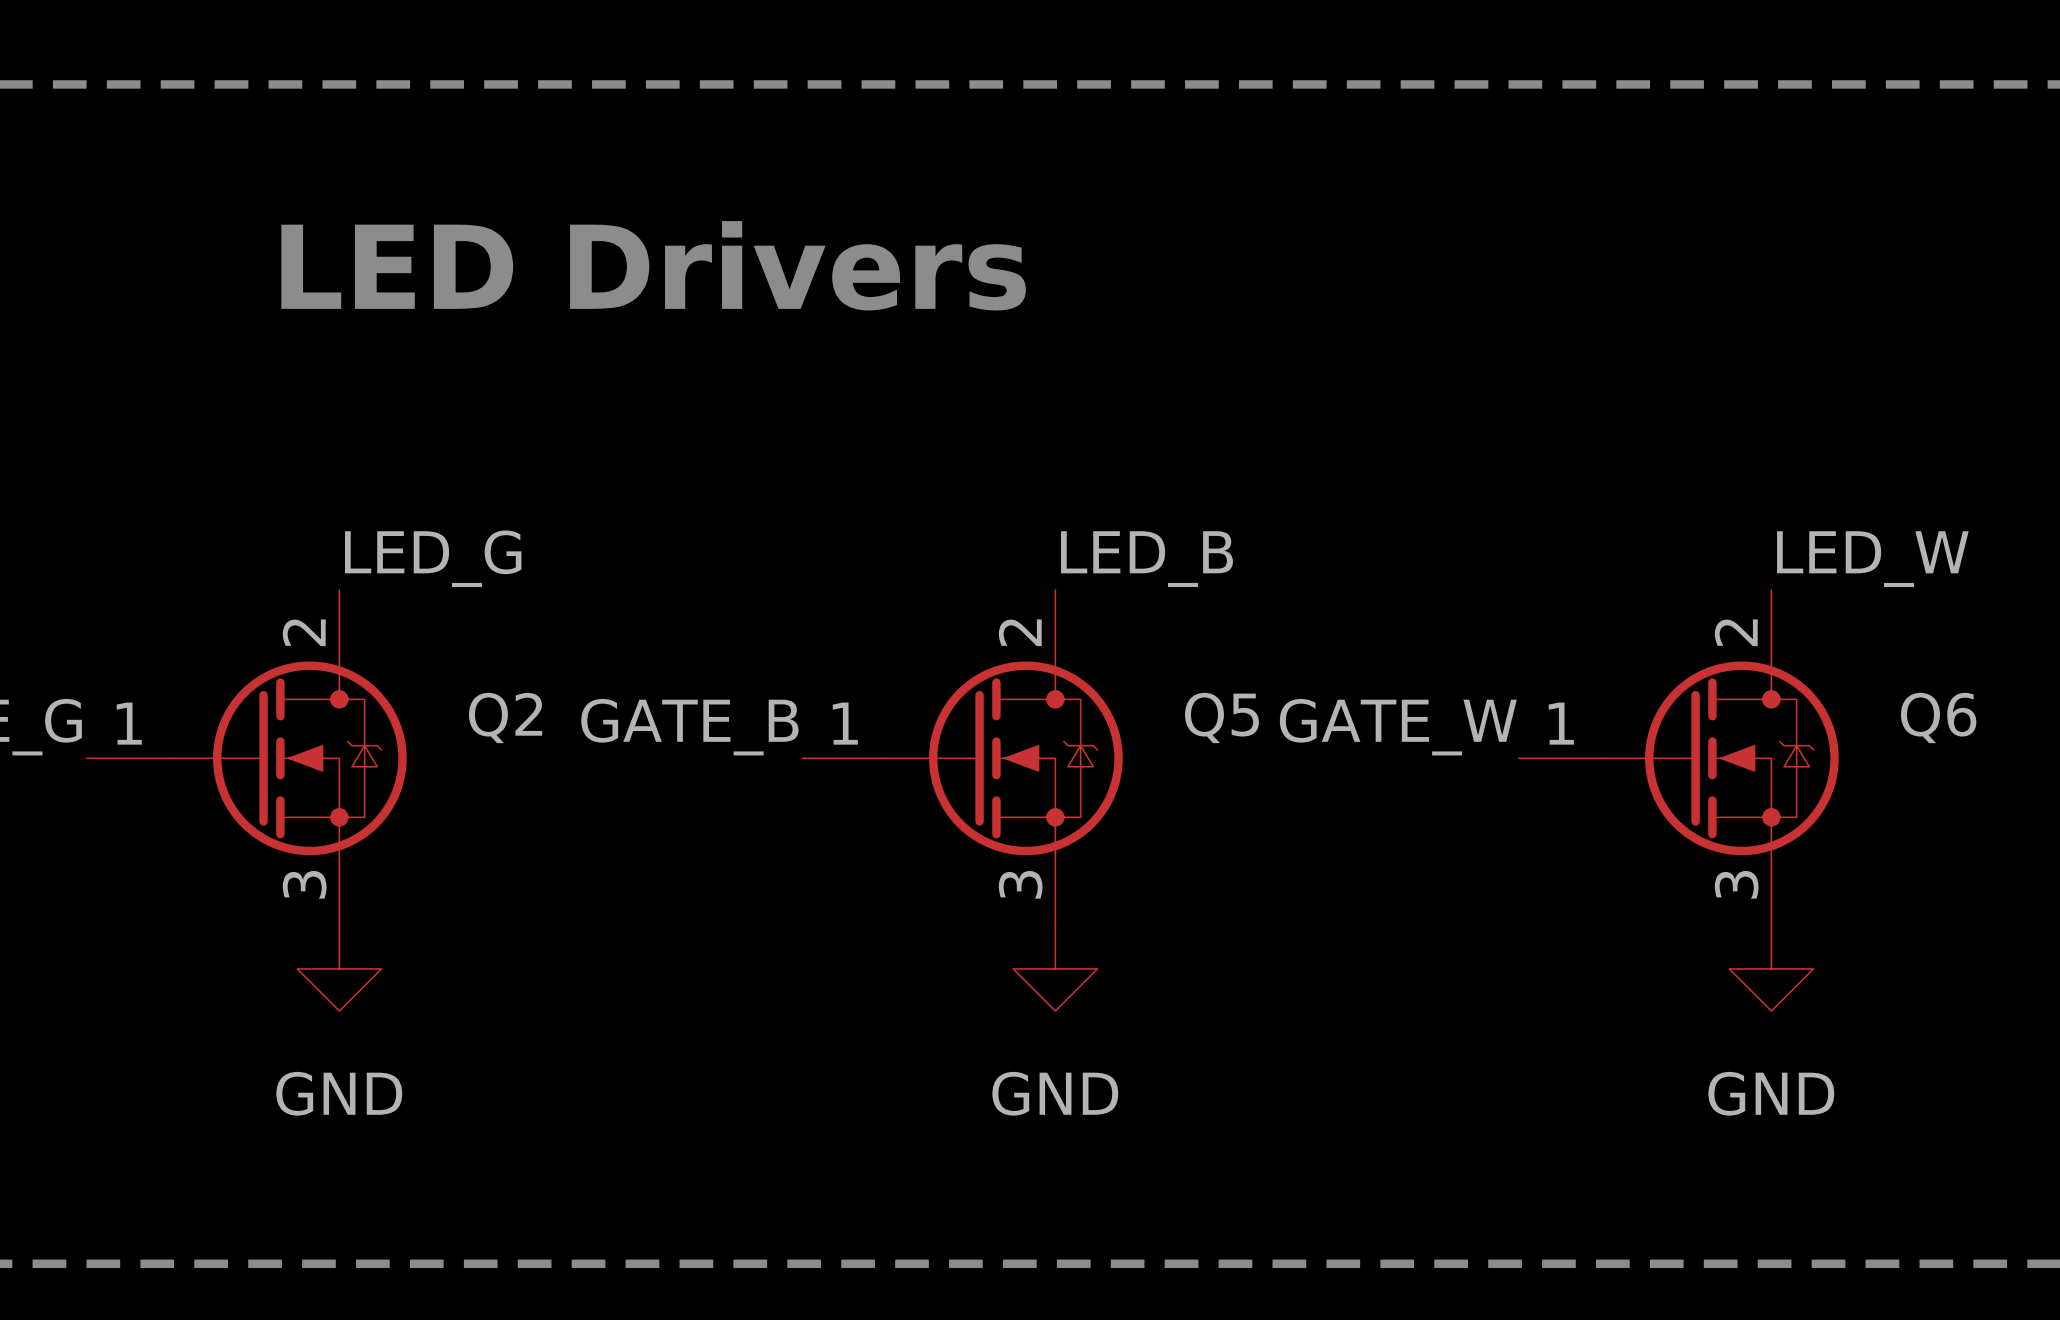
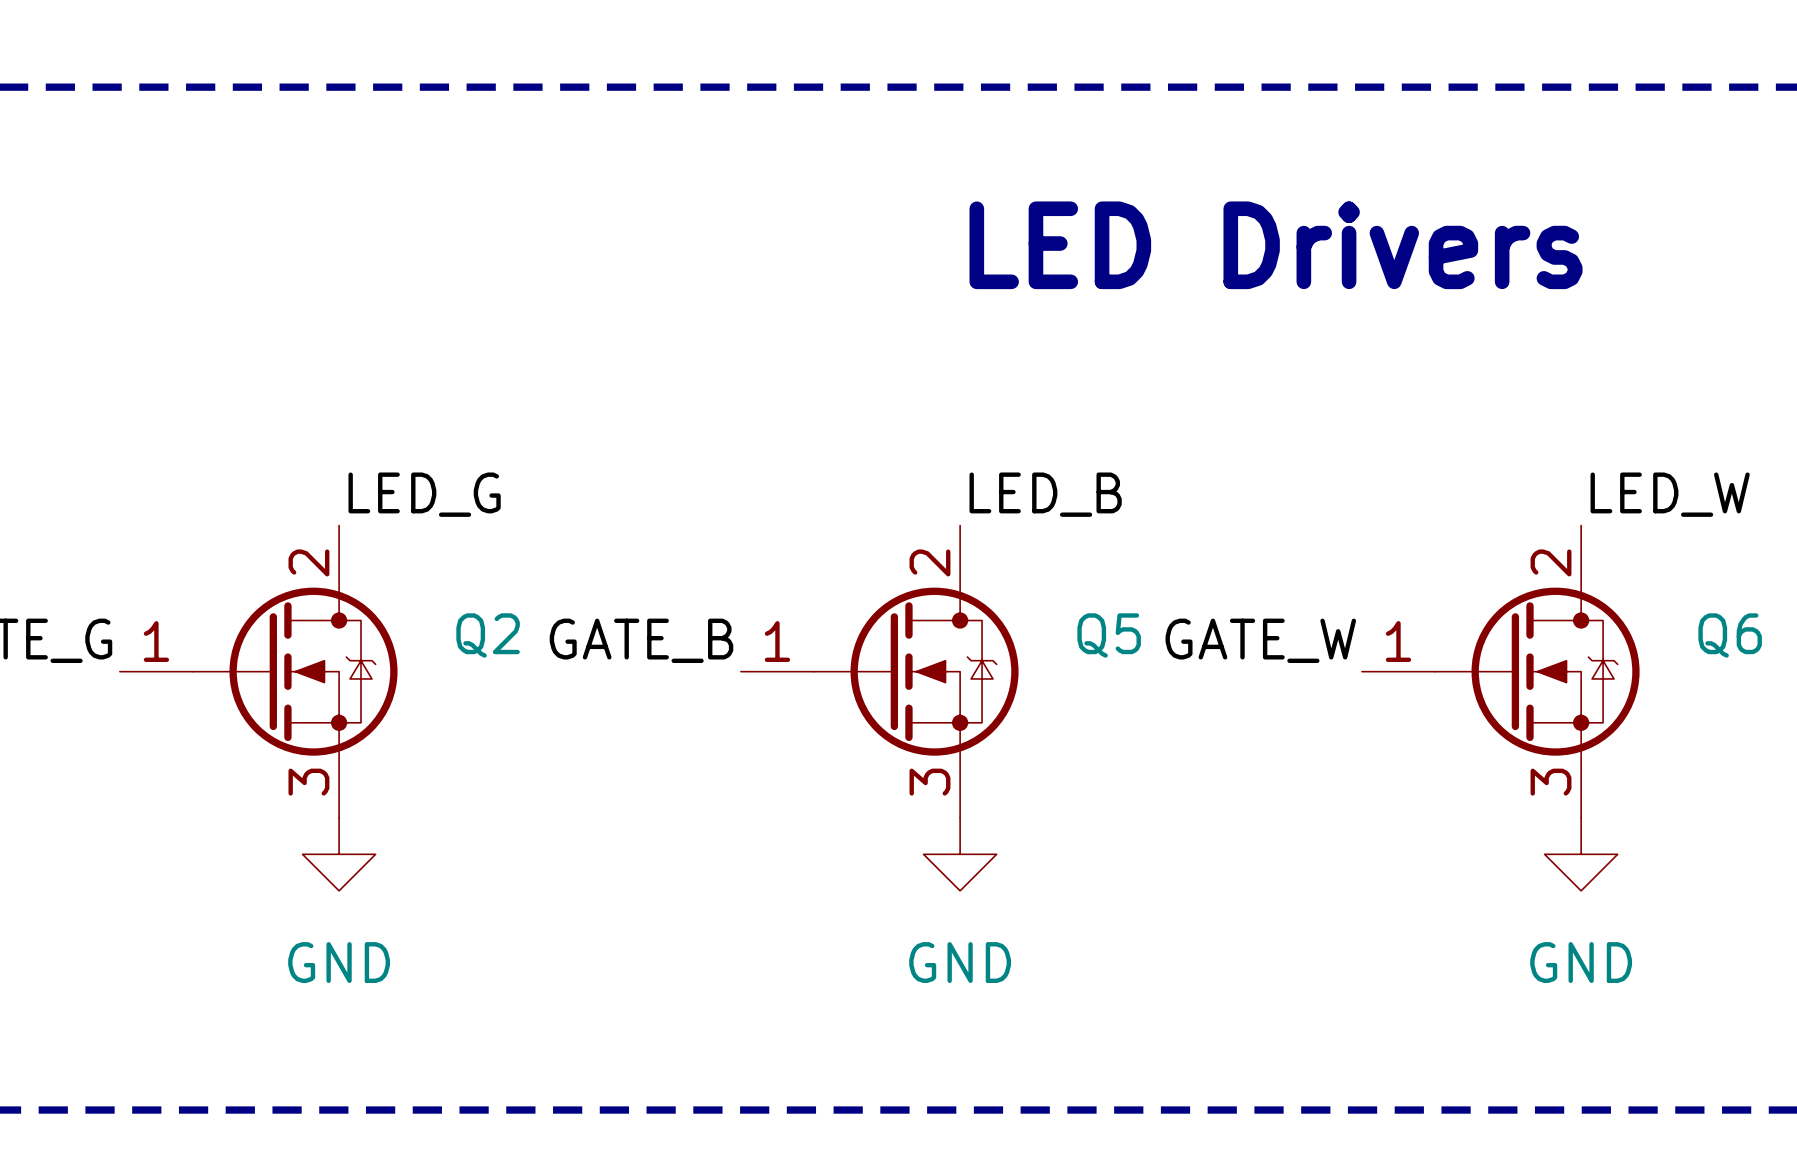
text position: LED Drivers (653, 265) -> LED Drivers (1276, 245)

